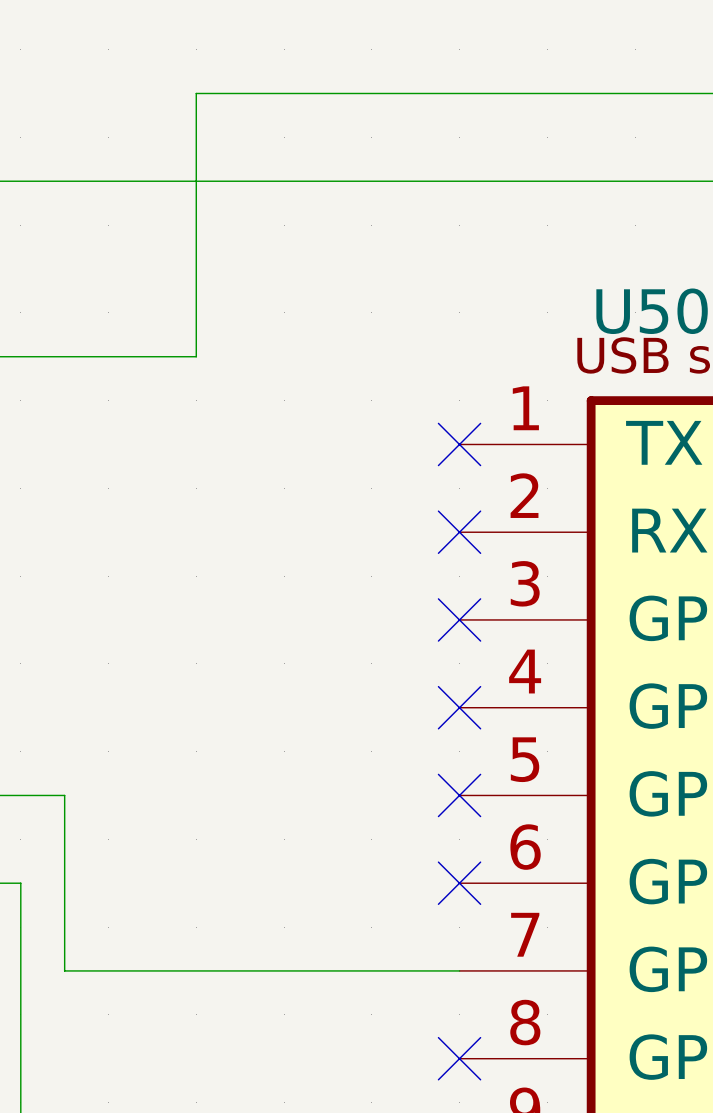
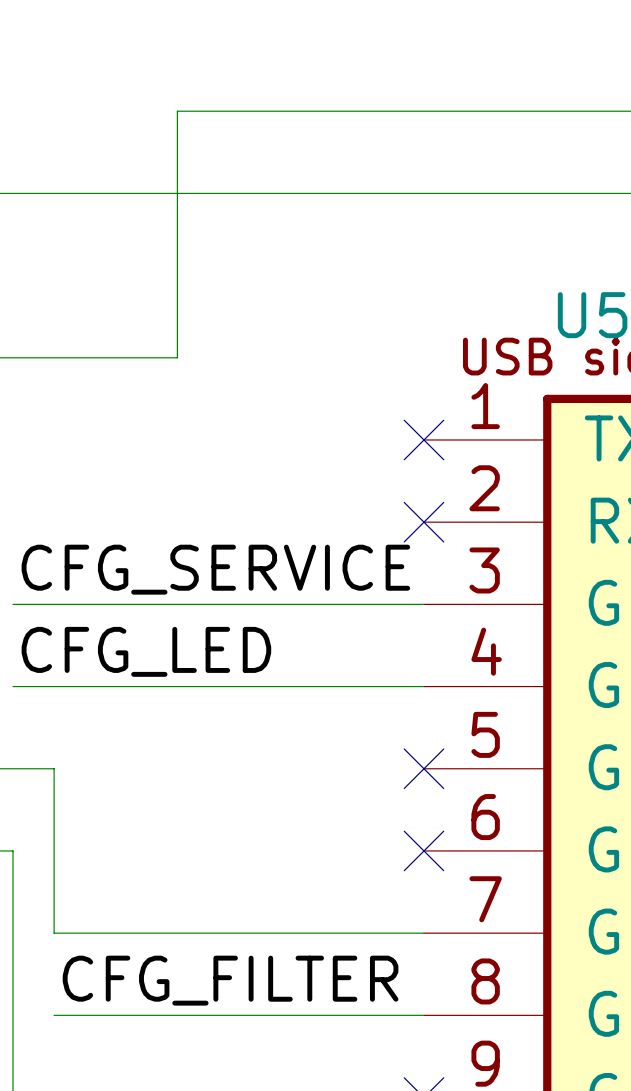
label: none -> CFG_SERVICE (215, 569)
wire: none -> (13, 604) (423, 604)
no-connect mark: (459, 619) -> none
label: none -> CFG_LED (146, 651)
wire: none -> (13, 686) (423, 686)
no-connect mark: (459, 707) -> none
label: none -> CFG_FILTER (230, 980)
wire: none -> (54, 1015) (423, 1015)
no-connect mark: (459, 1058) -> none

